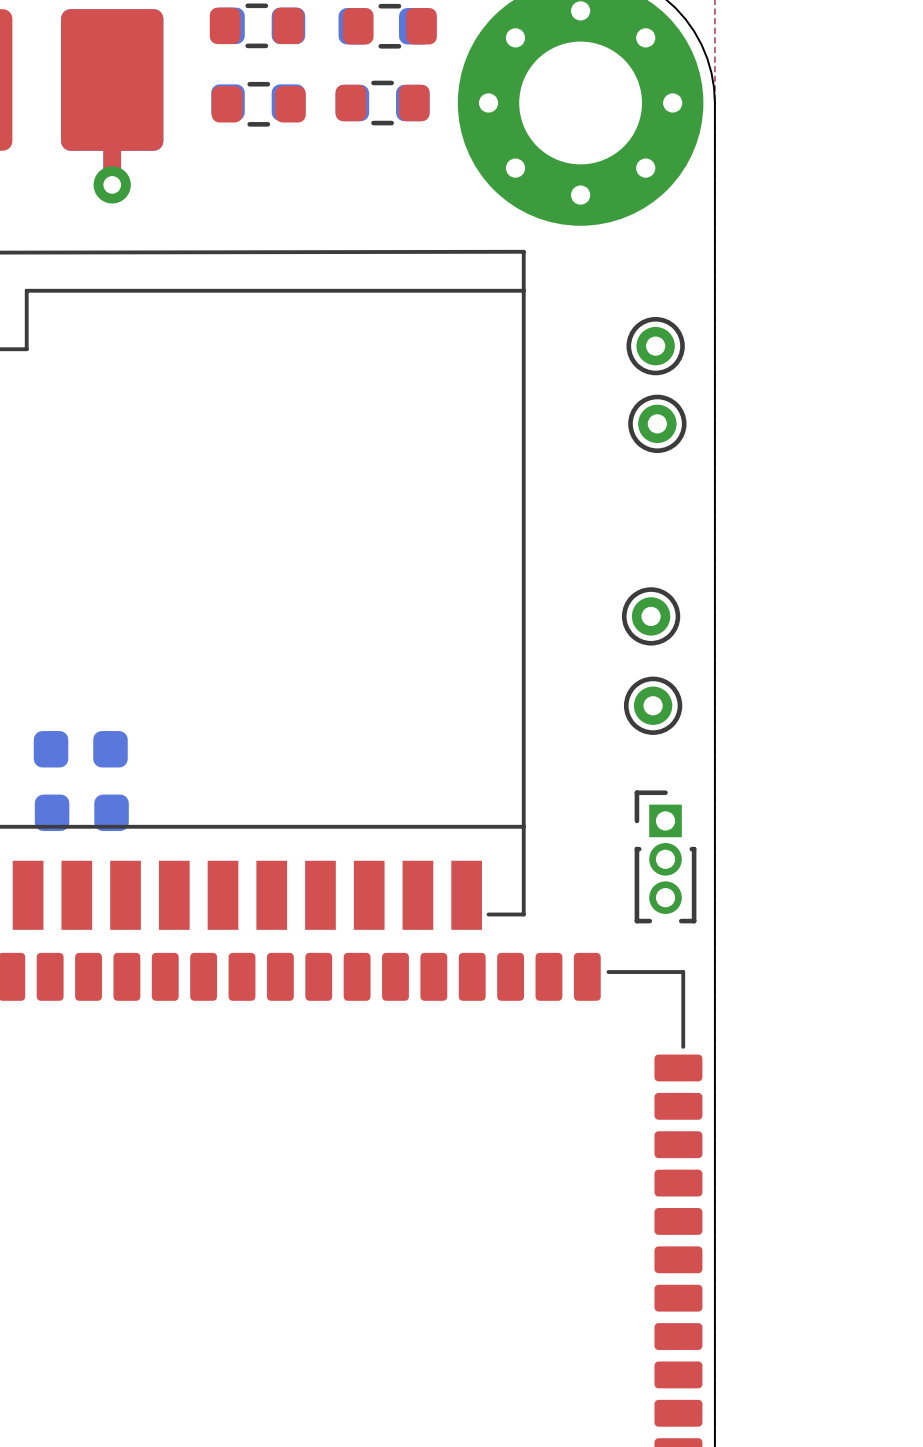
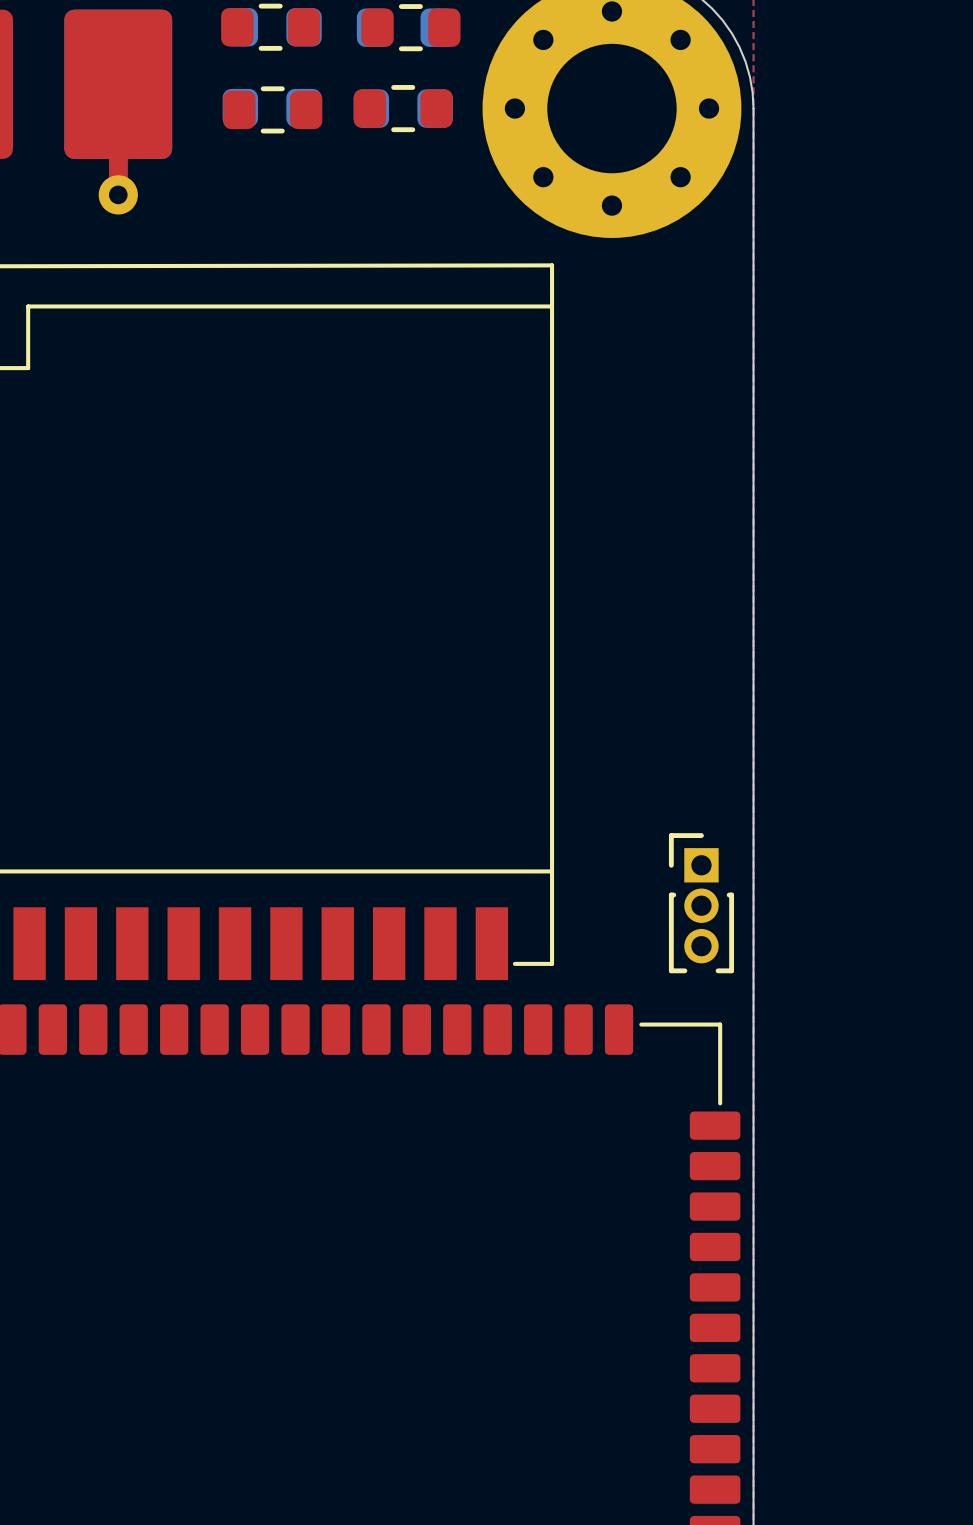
part: (655, 346) -> none
part: (657, 423) -> none
part: (651, 616) -> none
part: (653, 705) -> none
part: (80, 749) -> none
part: (81, 812) -> none

